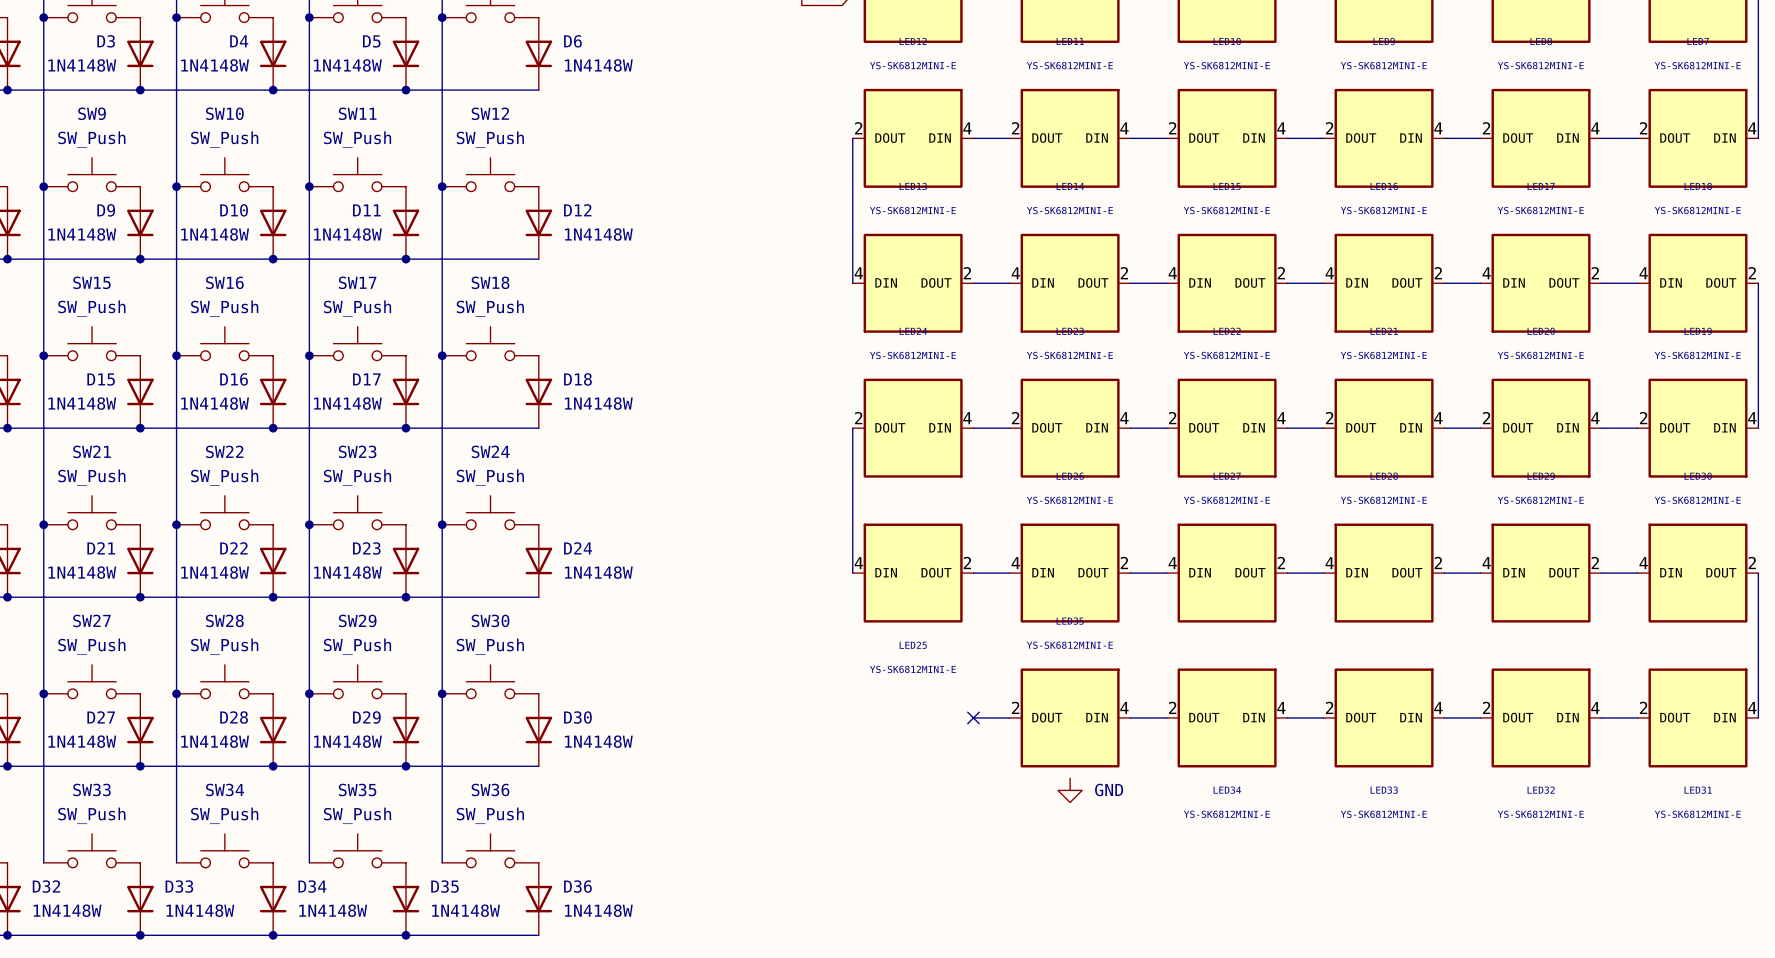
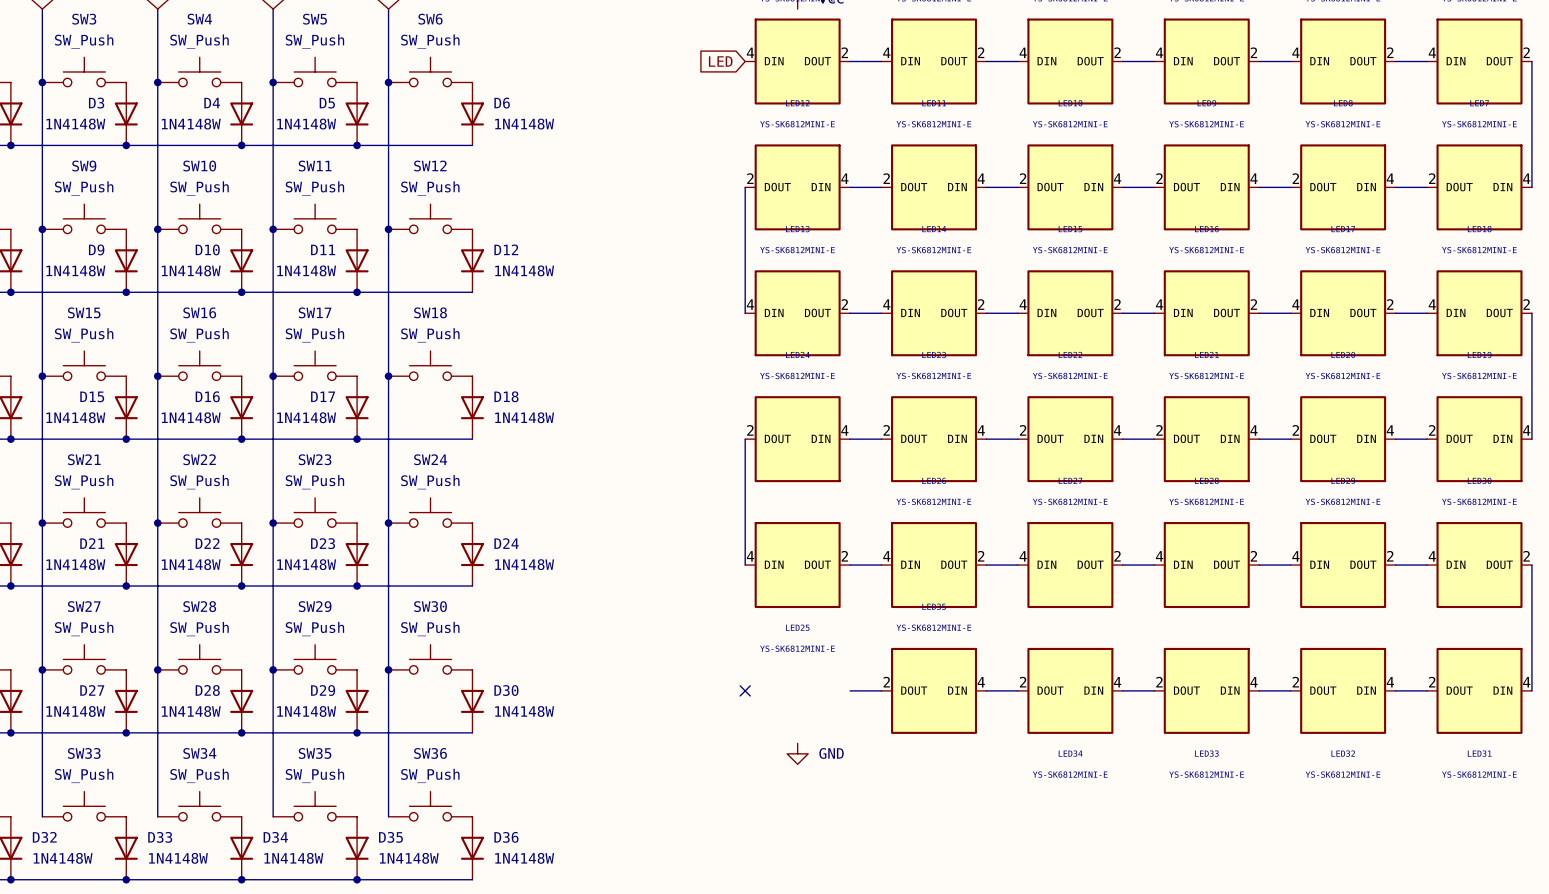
no-connect mark: none -> (745, 690)
no-connect mark: (973, 717) -> none
power symbol position: GND (1070, 790) -> GND (797, 753)

